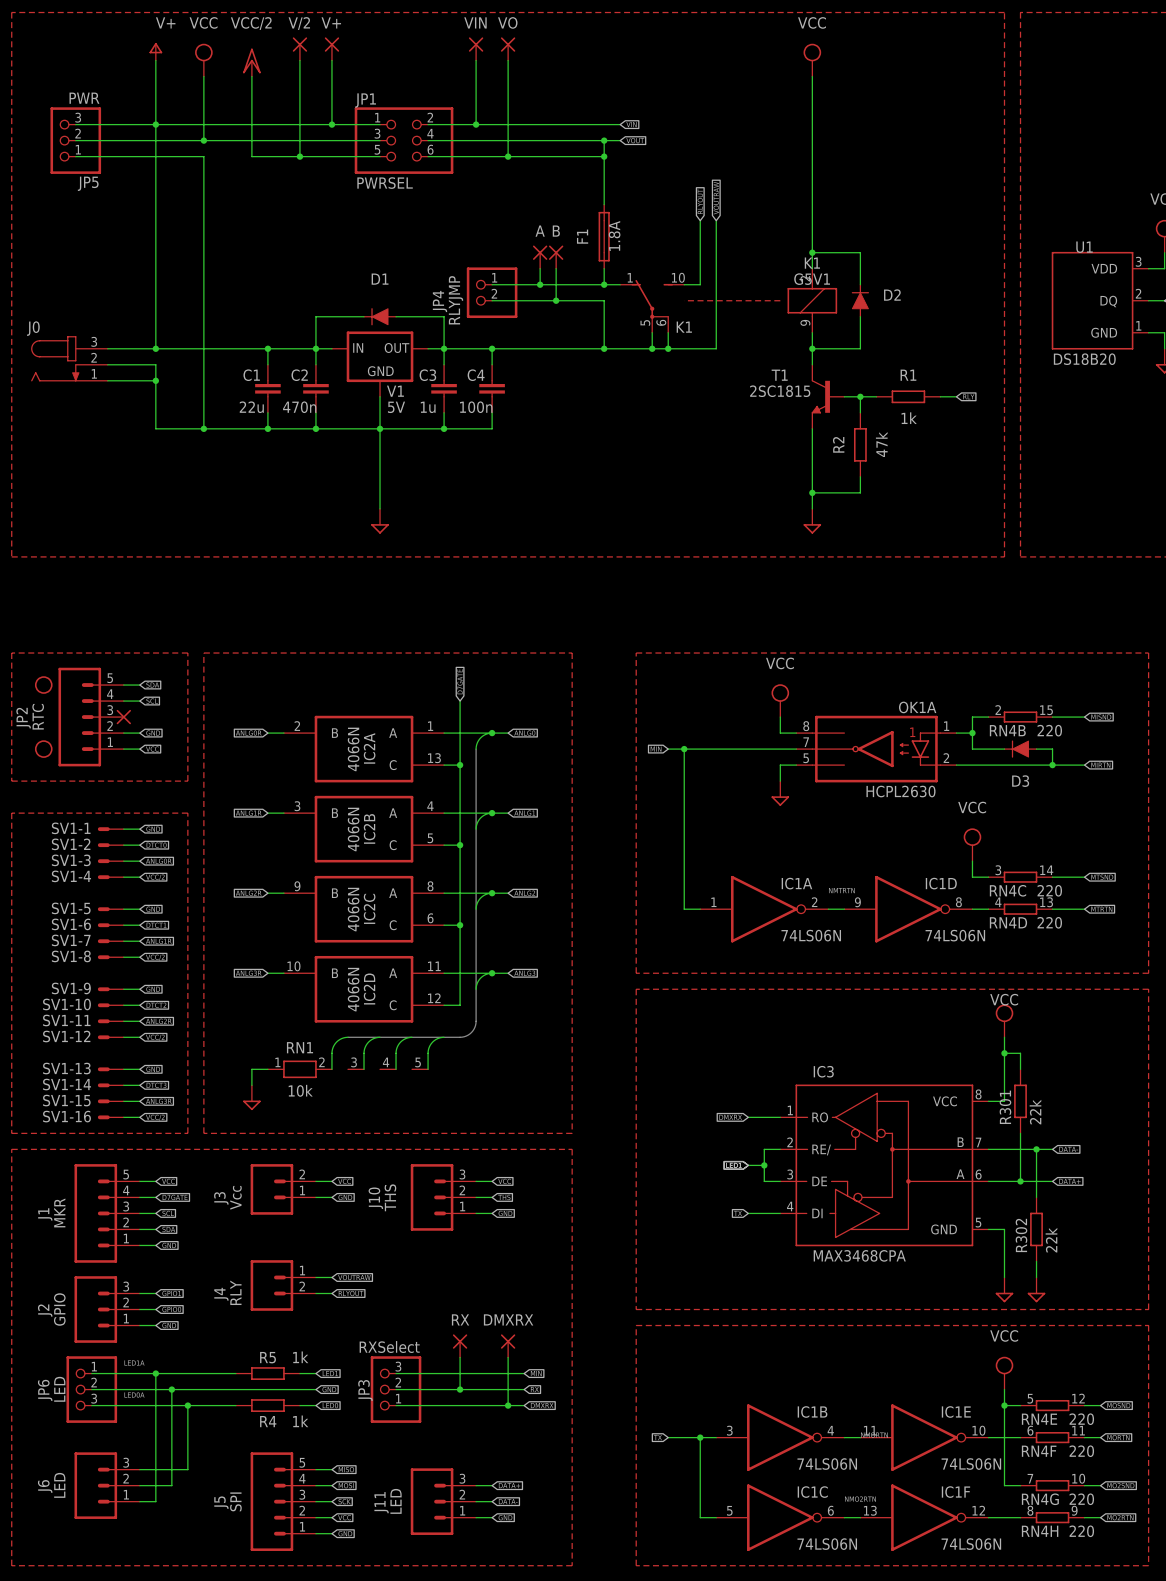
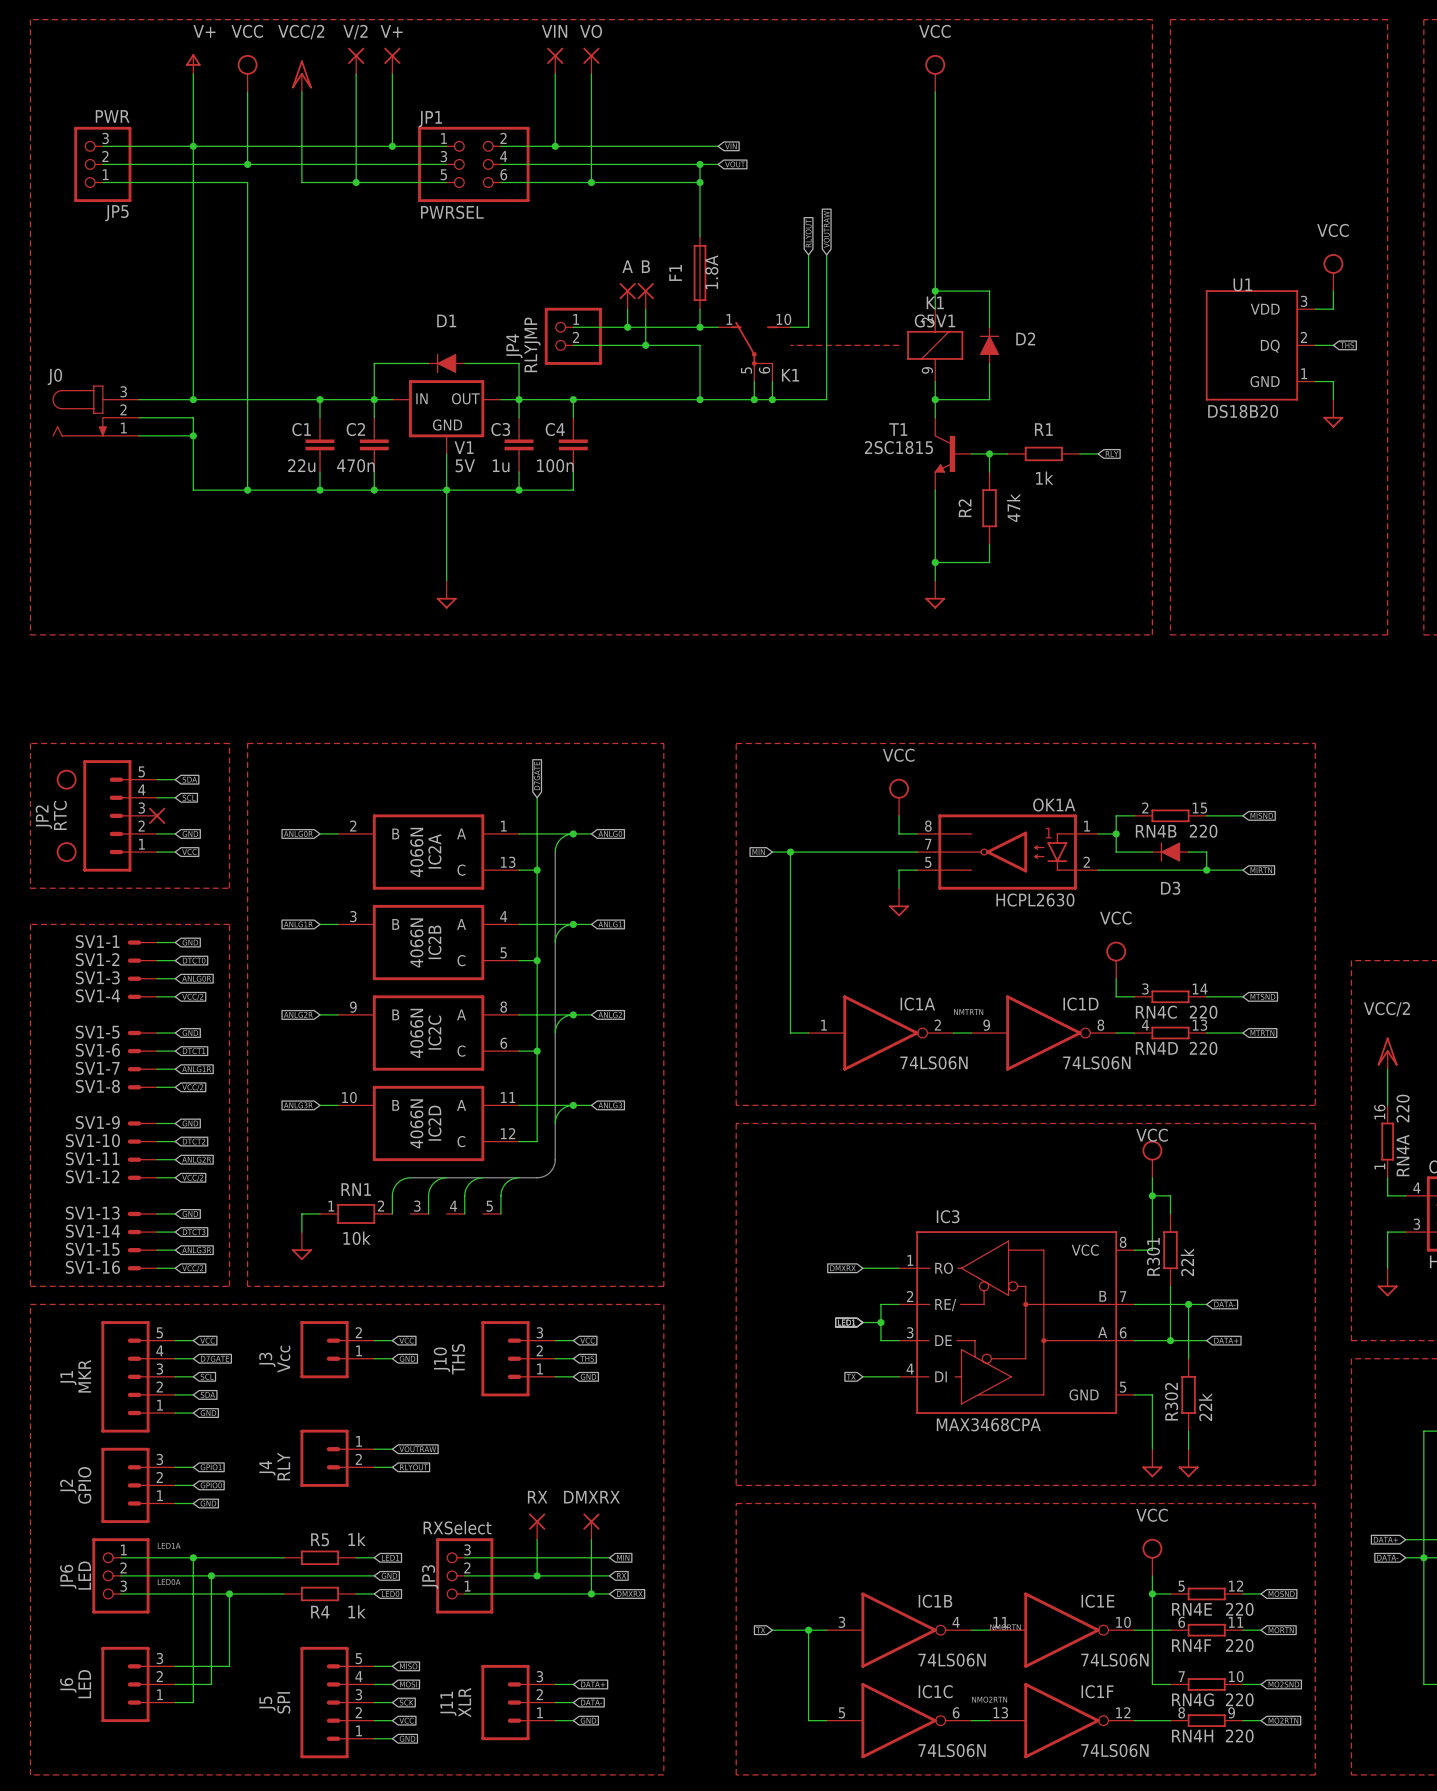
J11 value: LED (396, 1501) -> XLR (464, 1702)

